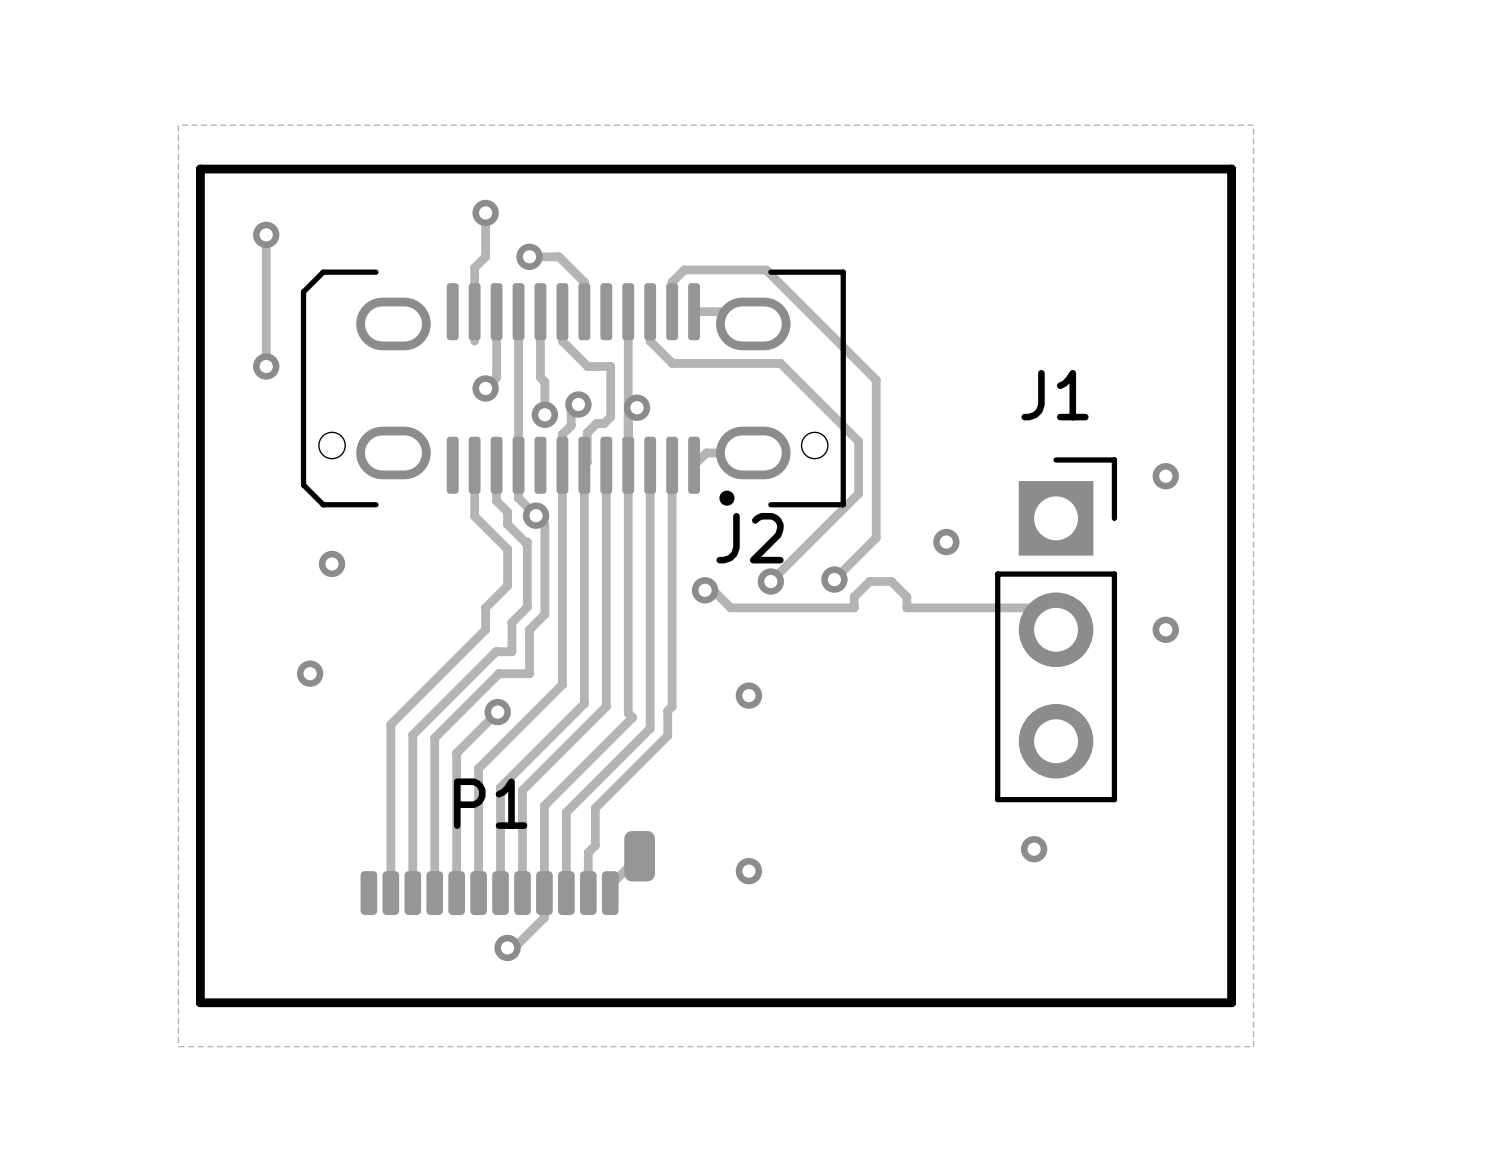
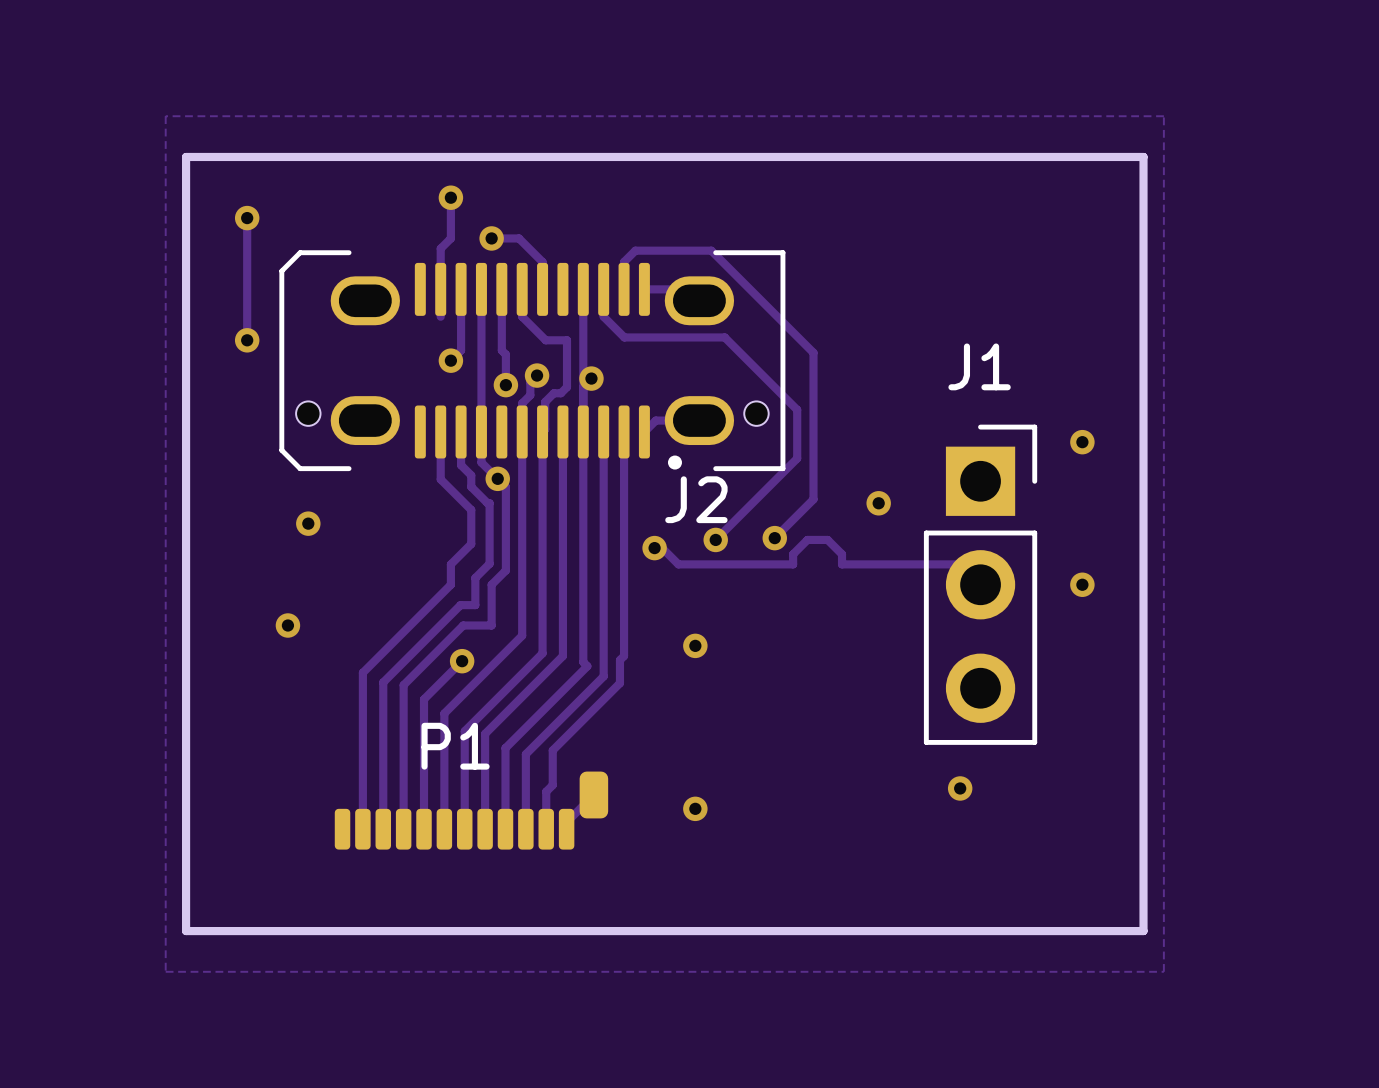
track: (544, 893) (544, 917) (514, 947) (507, 947) -> none
via: (507, 947) -> none

